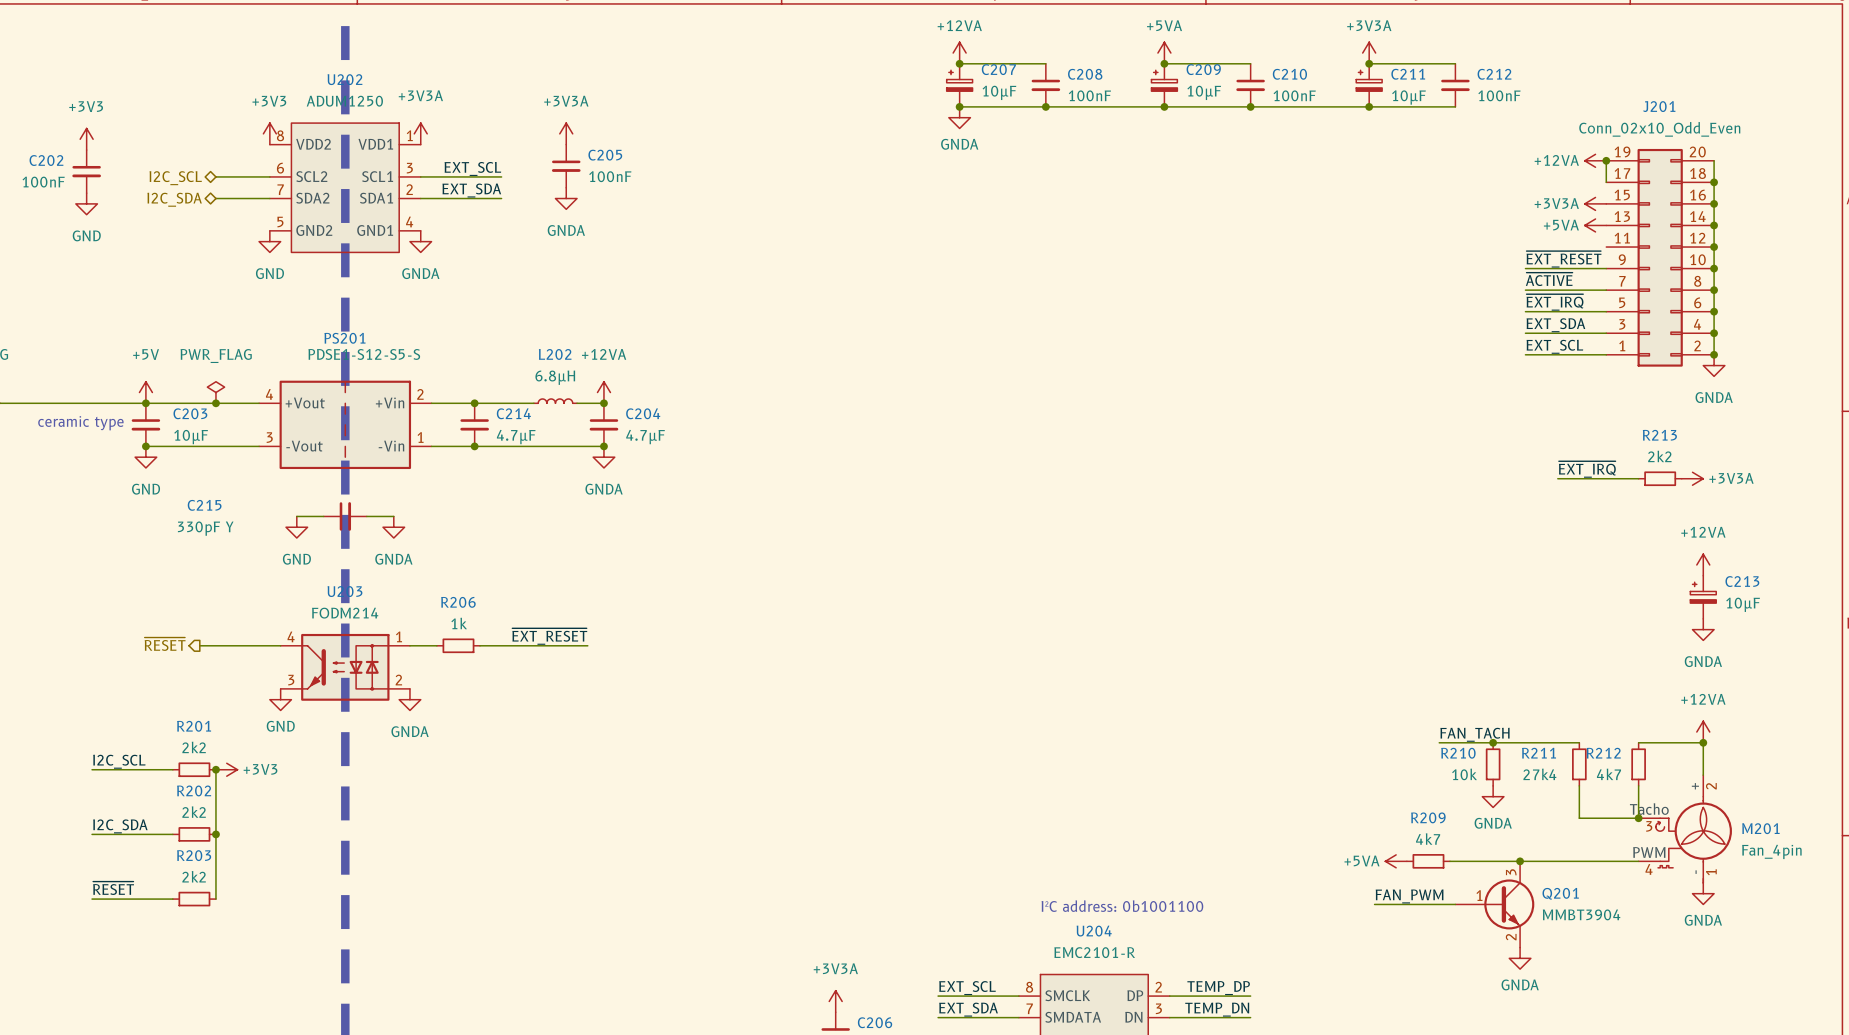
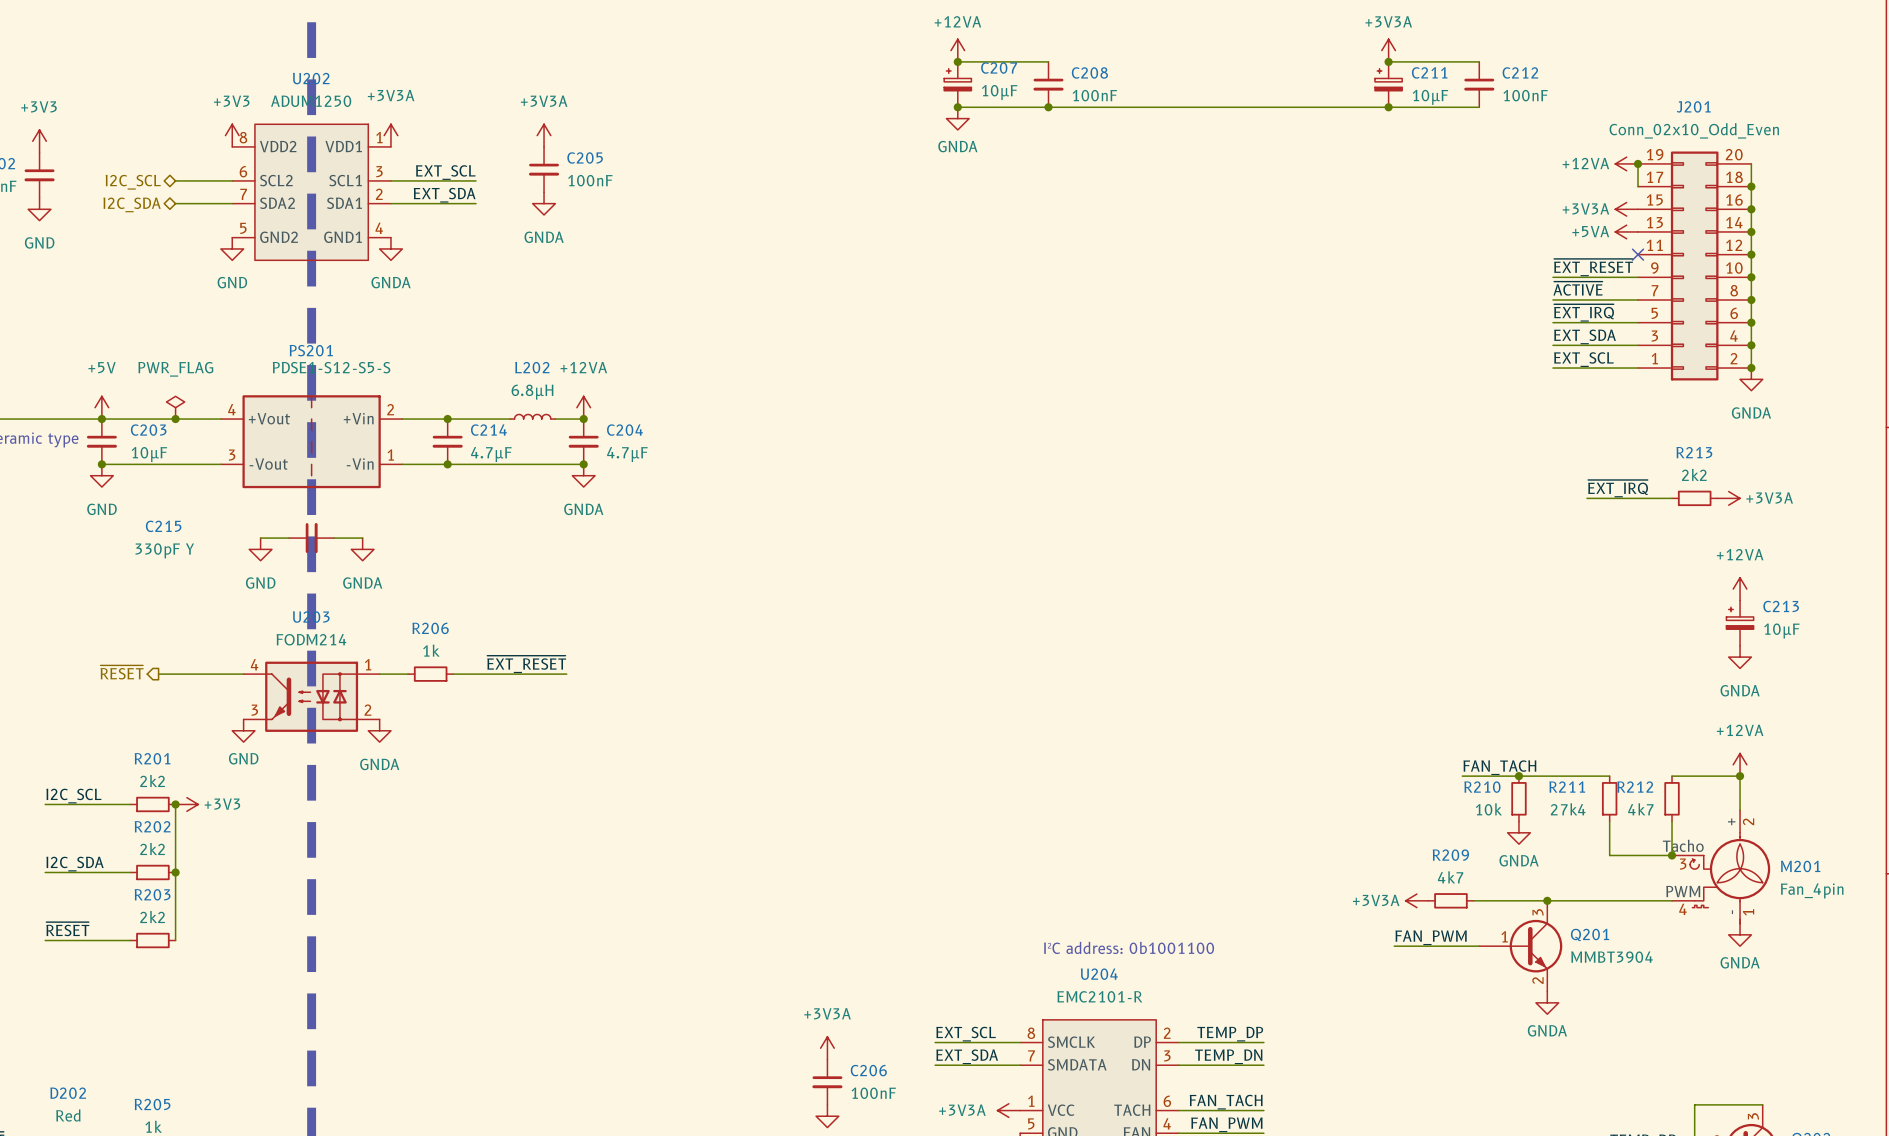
power symbol: +5VA (1164, 53) -> none
wire: (1164, 63) (1250, 63) -> none
junction: (1164, 63) -> none
C209: 10µF (1164, 85) -> none
C210: 100nF (1250, 85) -> none
junction: (1164, 106) -> none
junction: (1250, 106) -> none
no-connect mark: none -> (1638, 254)
power symbol: +5VA (1396, 861) -> +3V3A (1416, 900)

